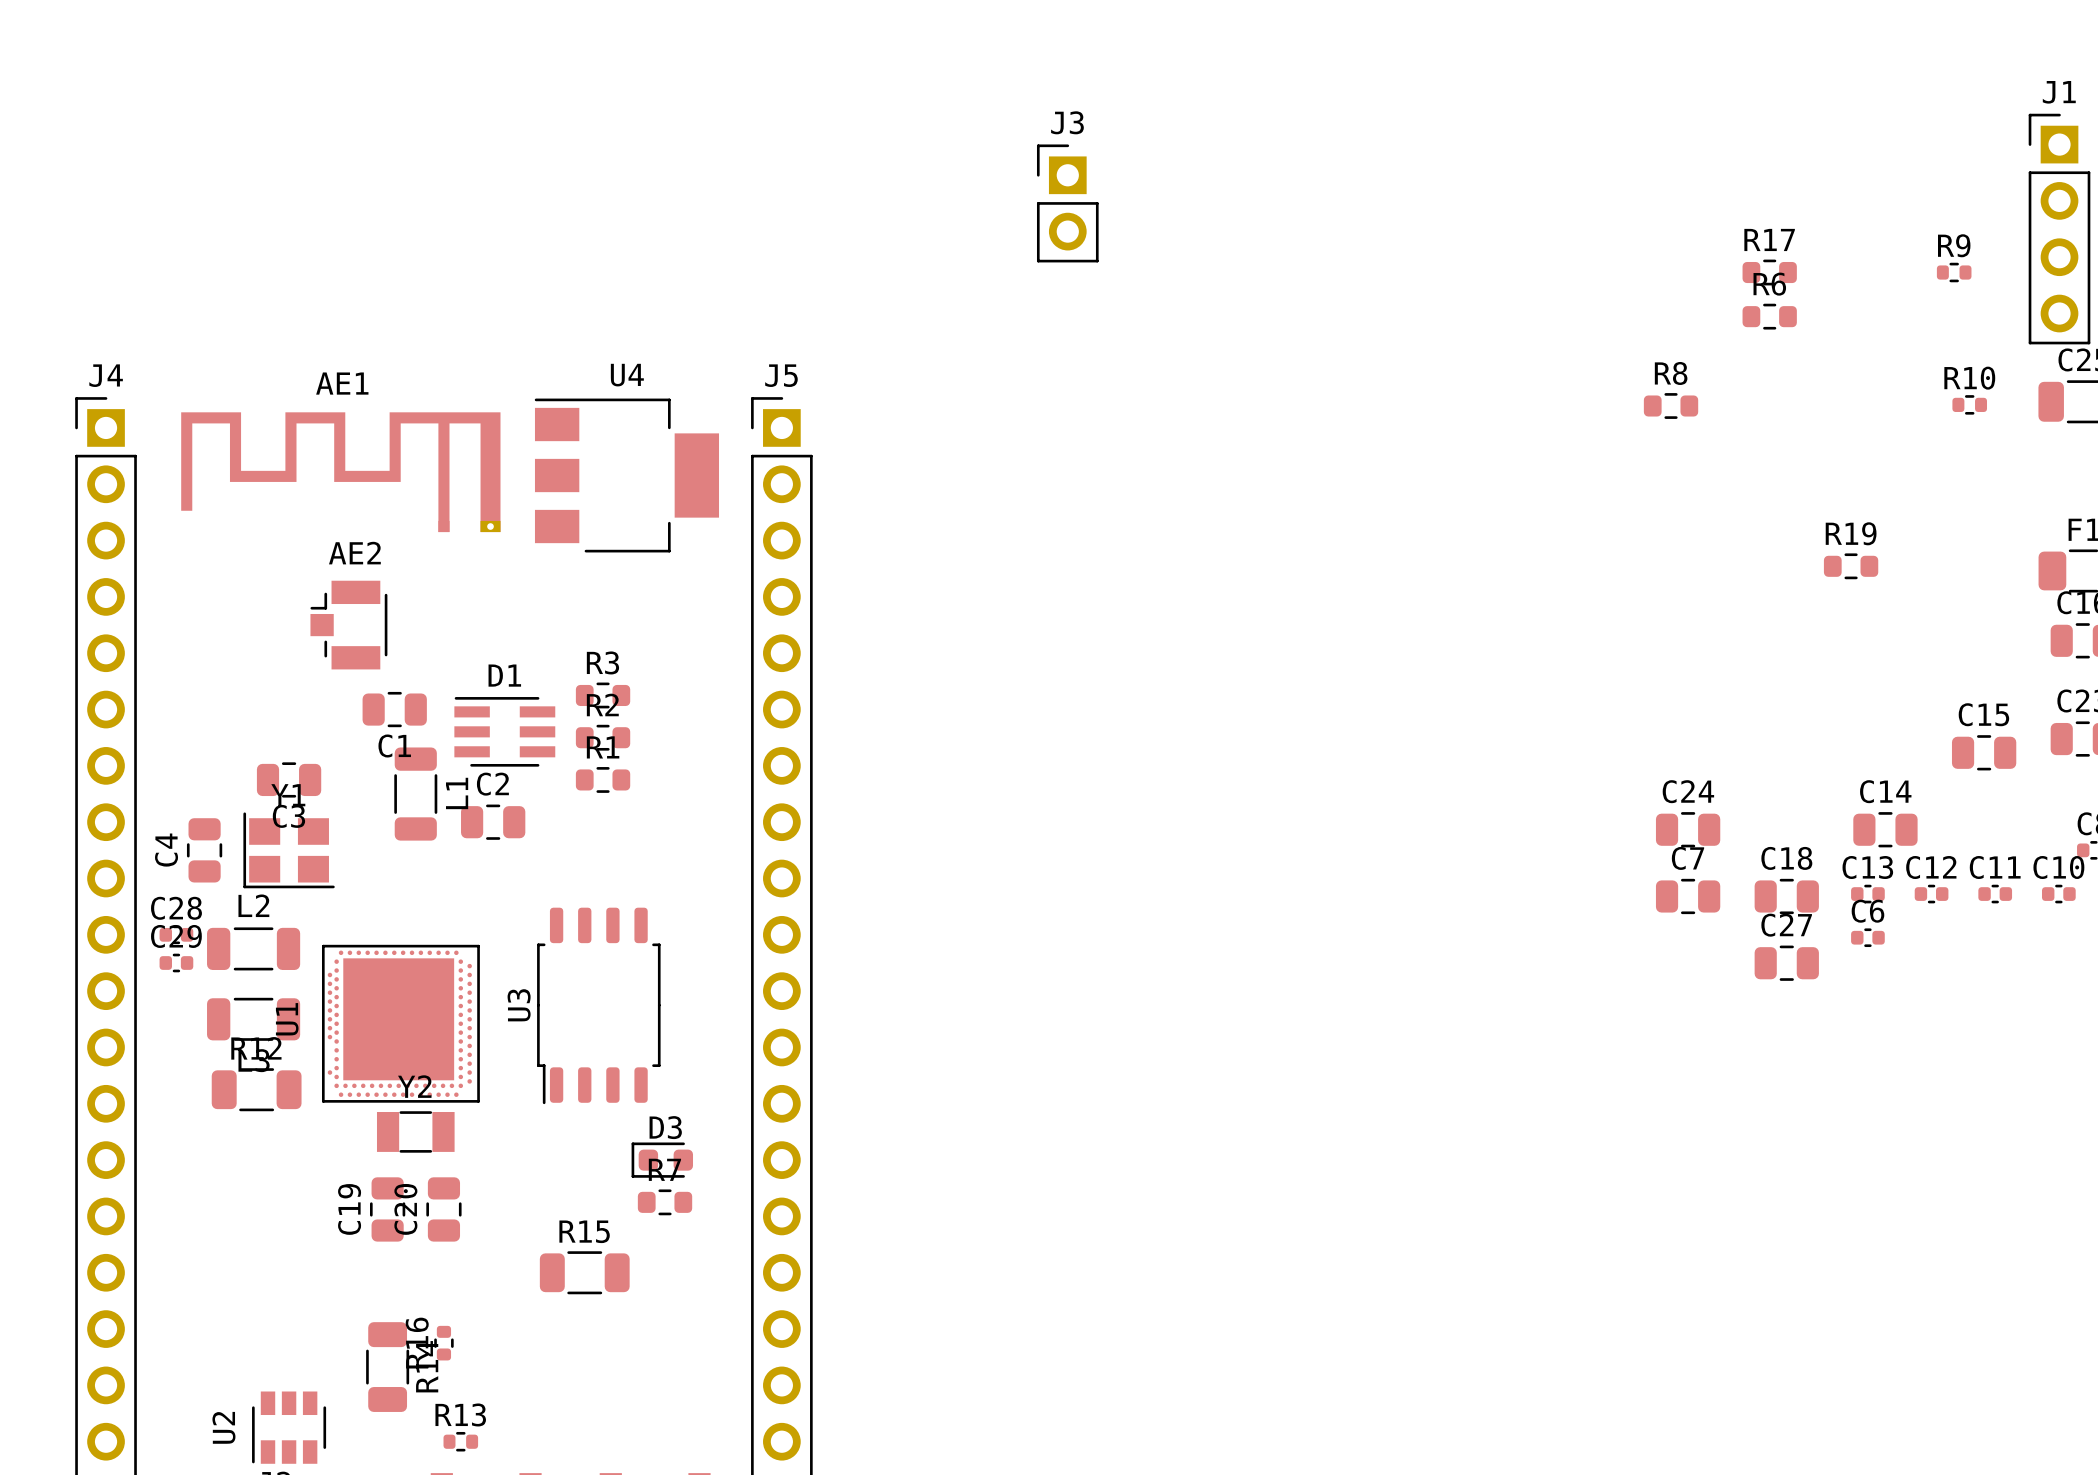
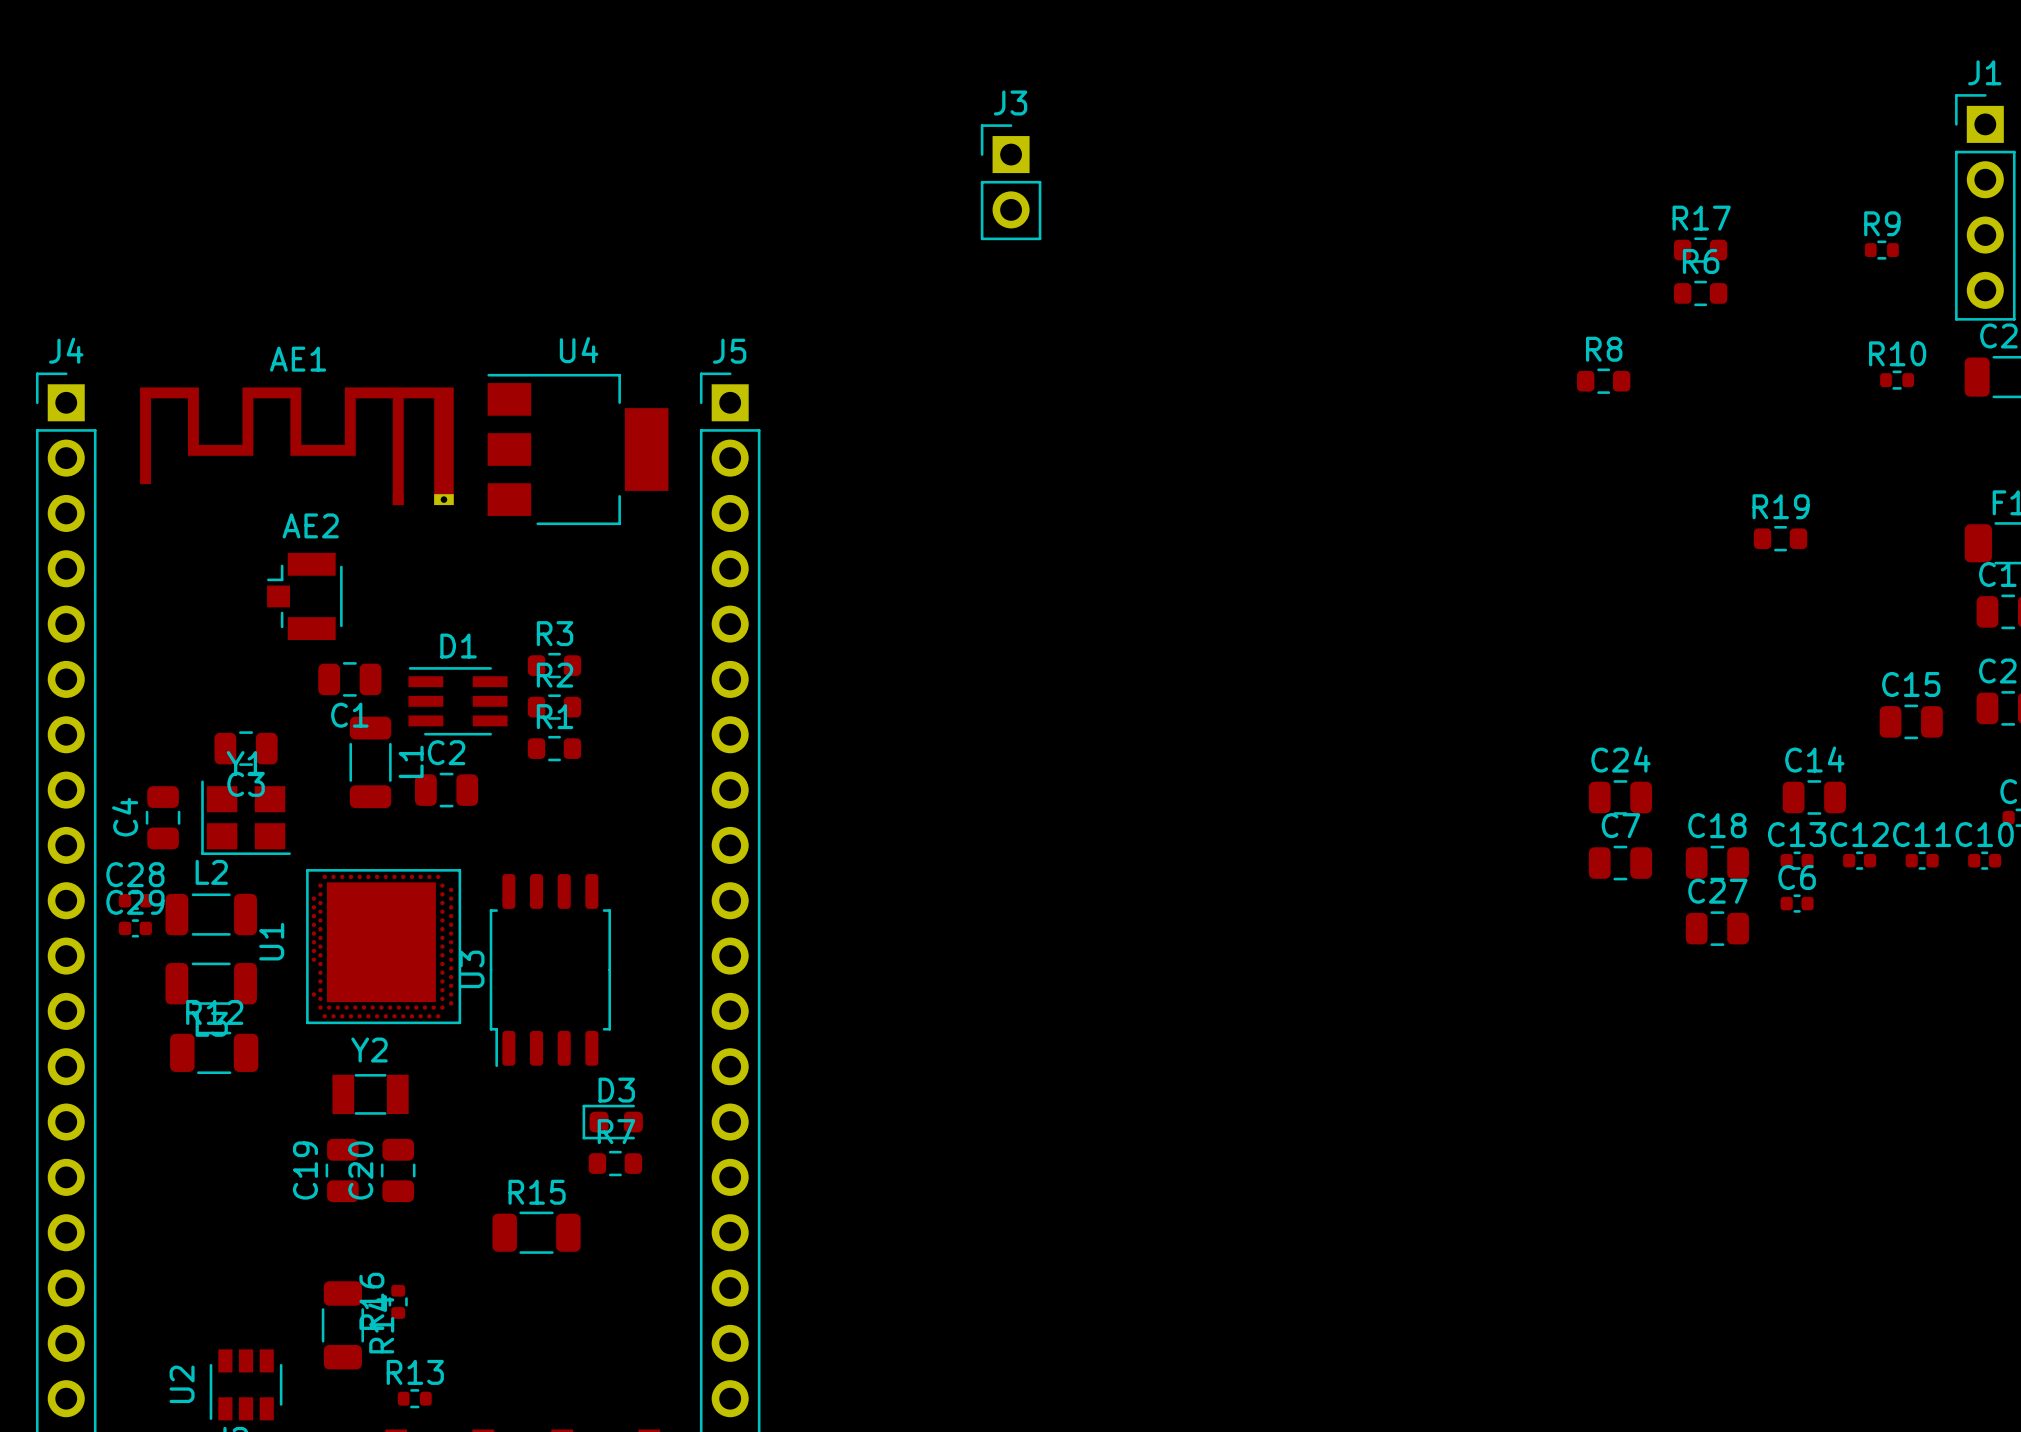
U1 position: (400, 1023) -> (383, 946)

